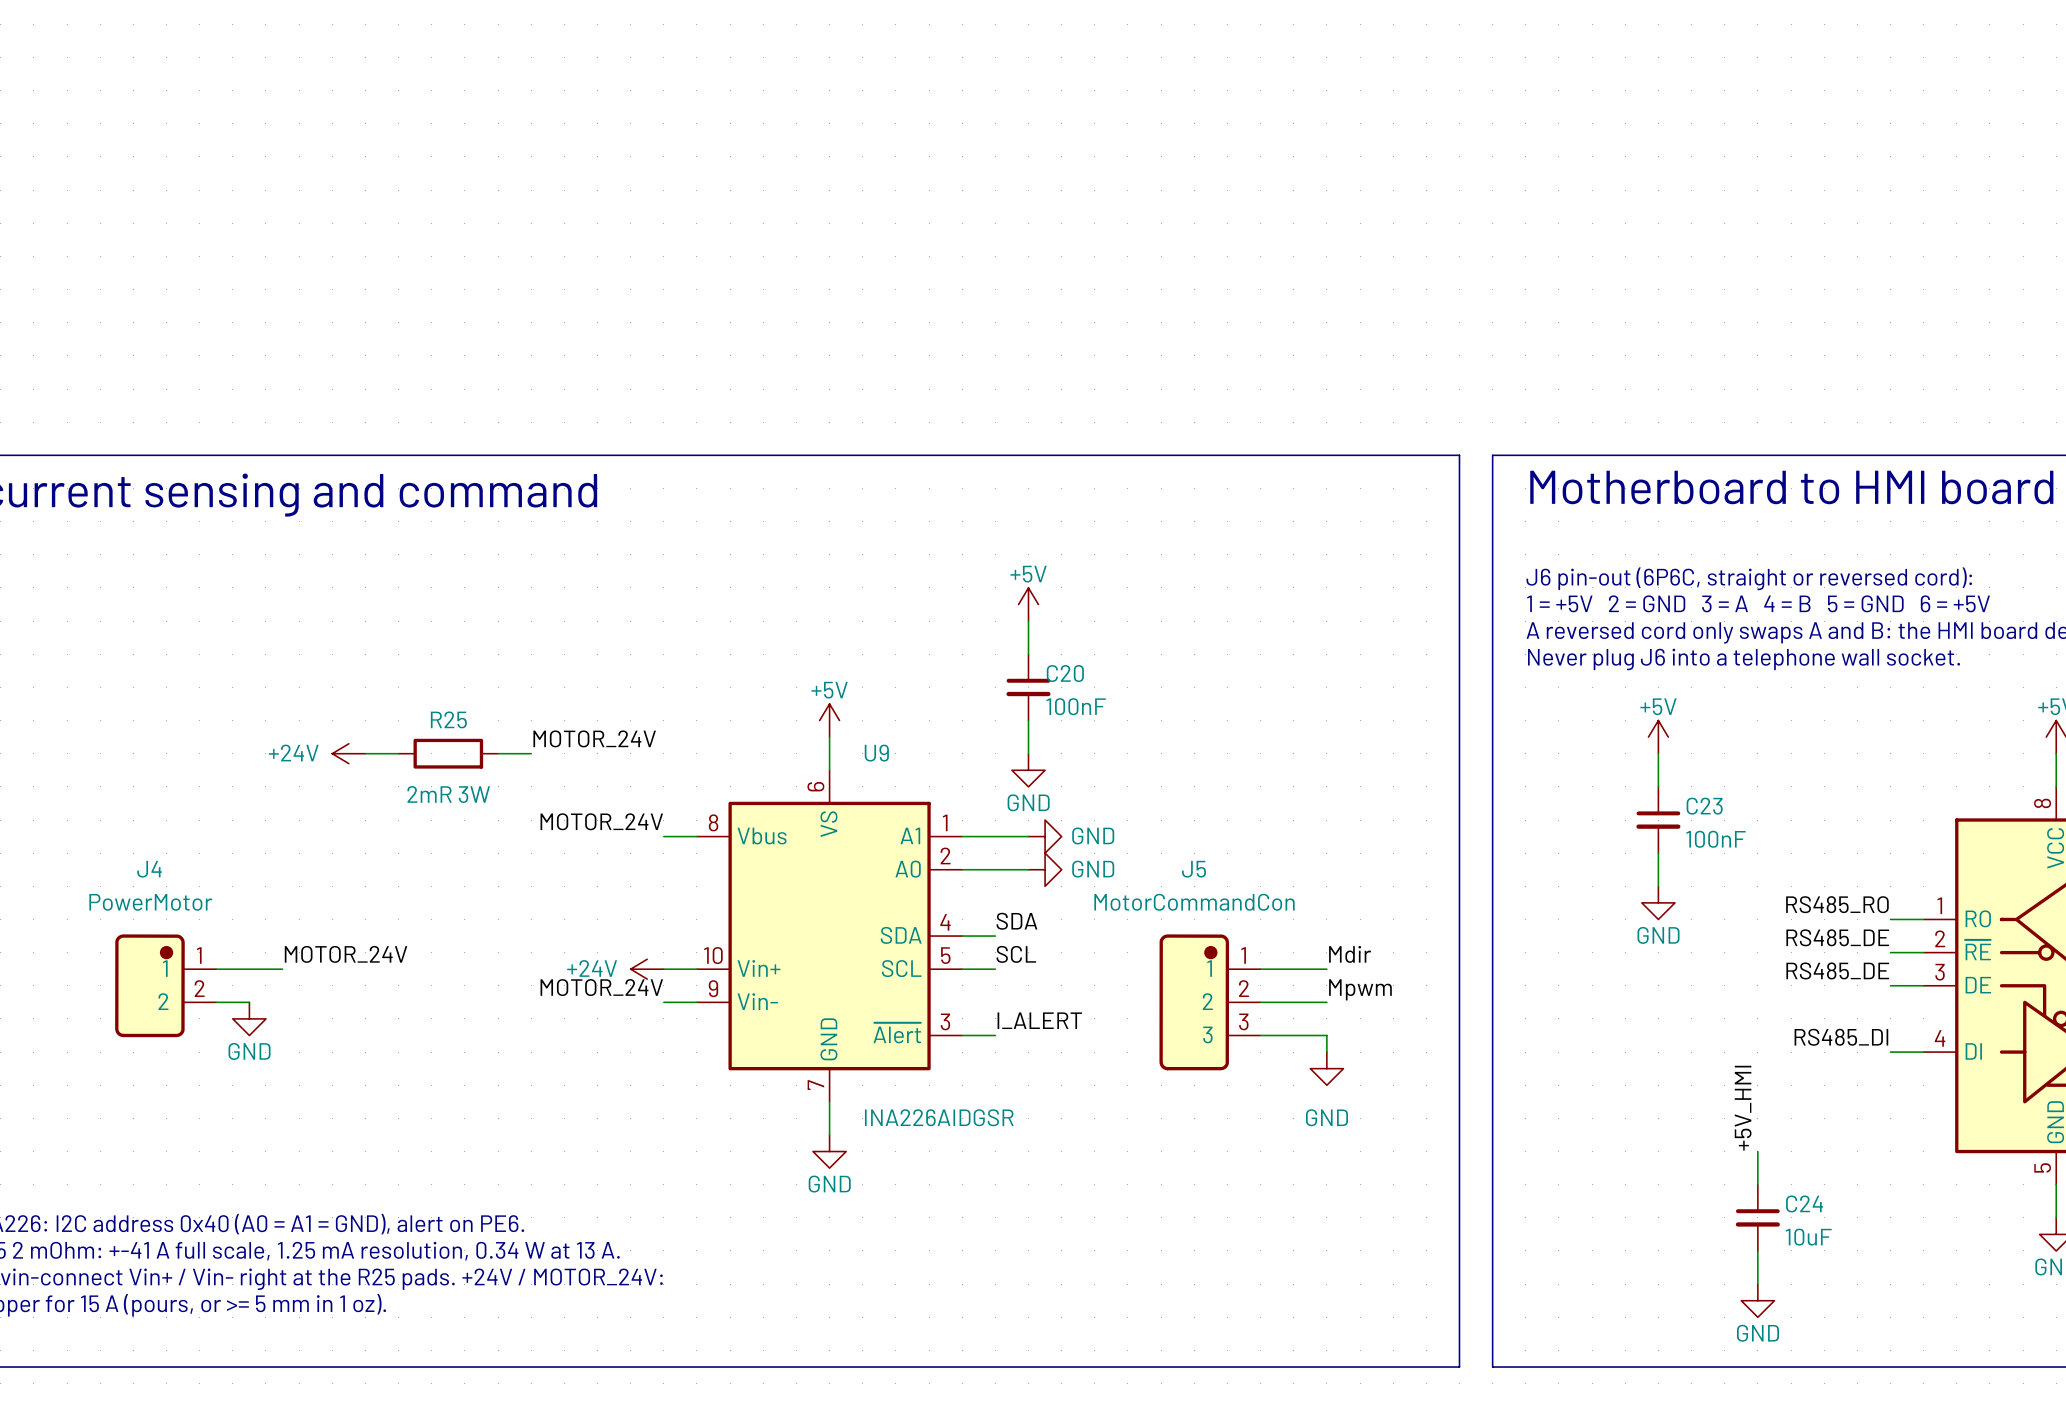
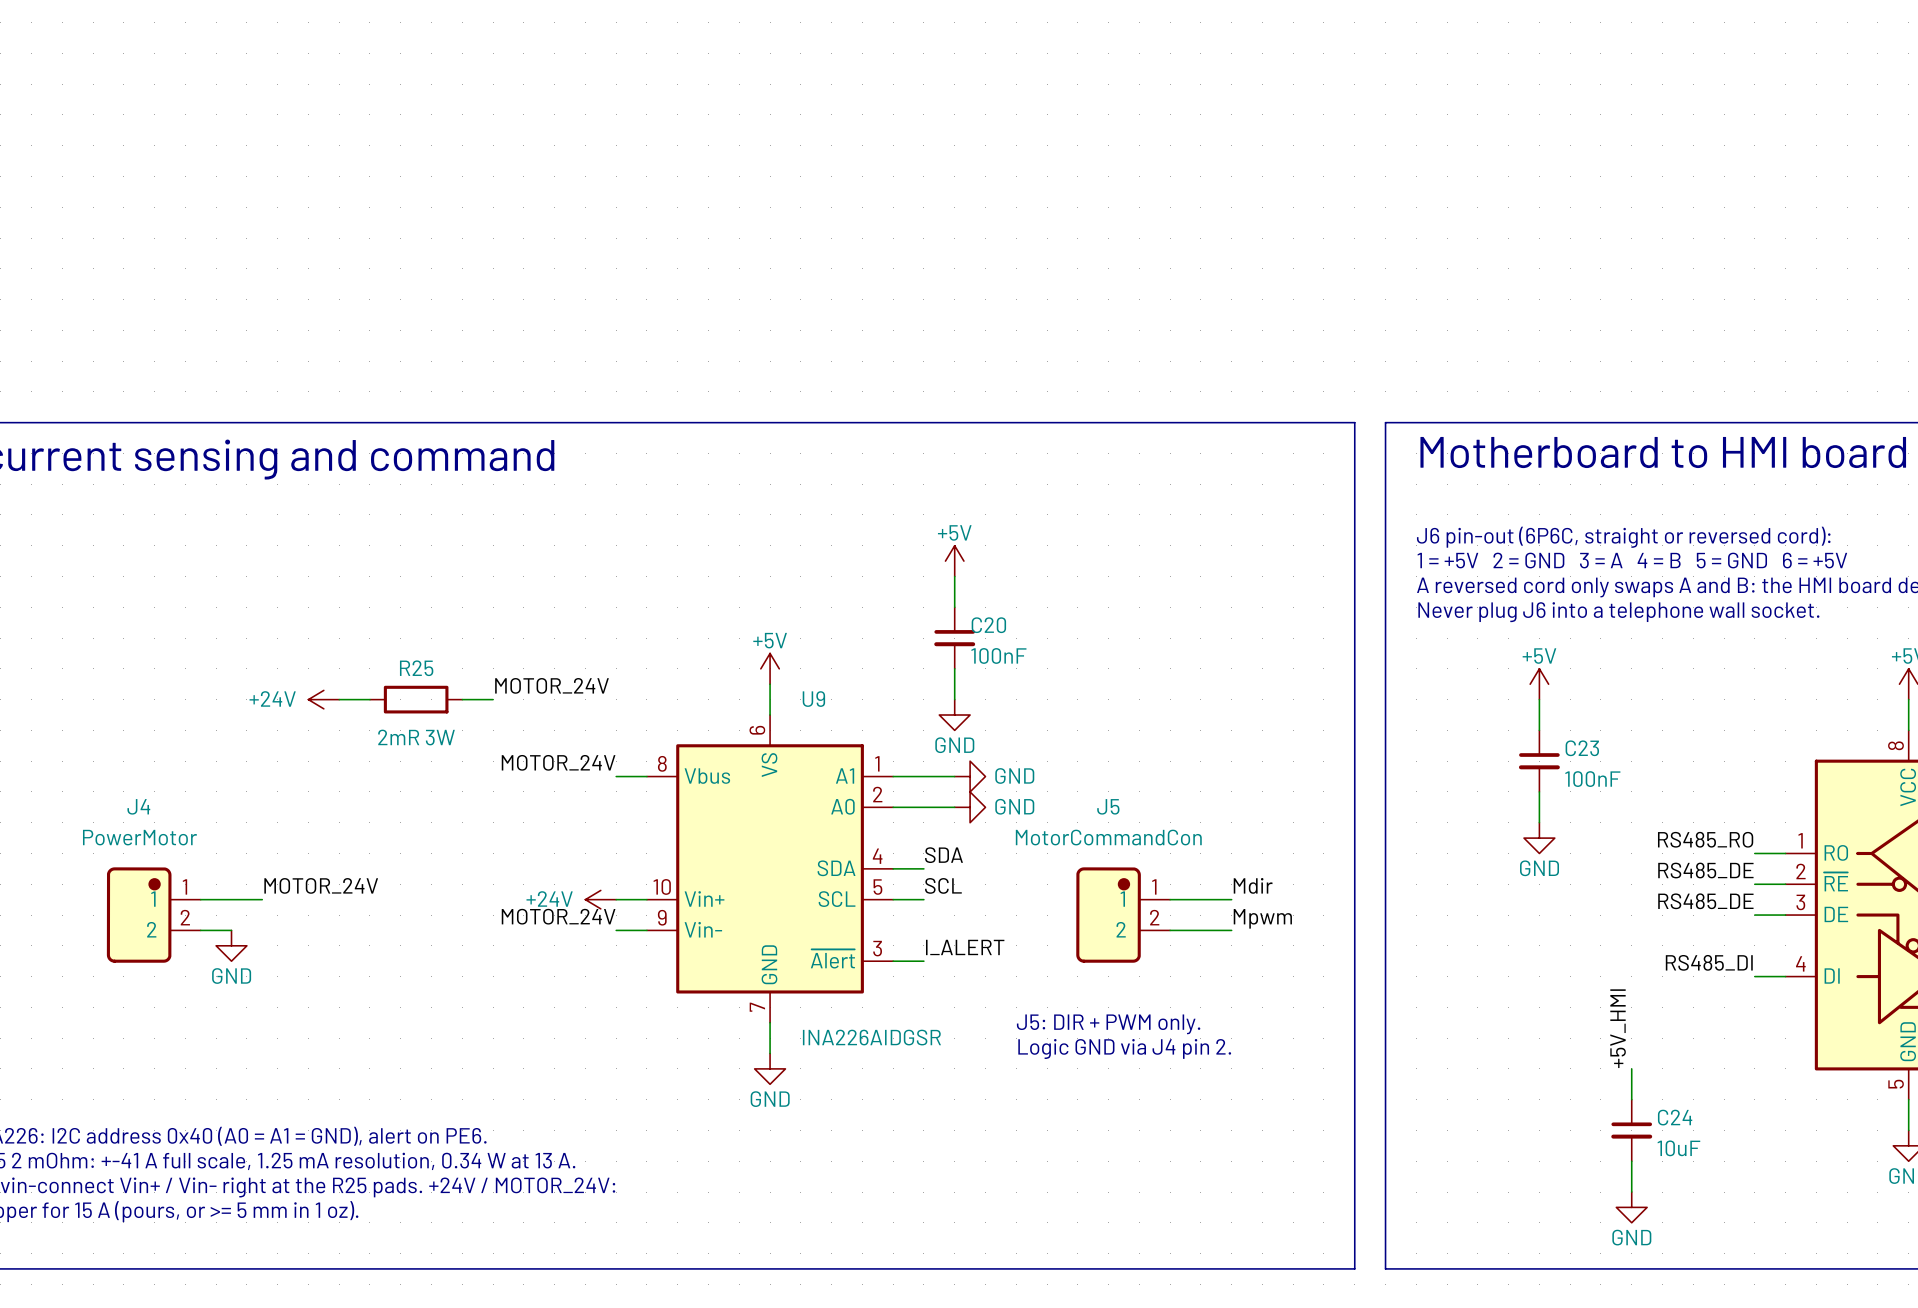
J5 symbol: [1159, 934, 1261, 1071] -> [1076, 867, 1171, 963]
wire: (1260, 1035) (1326, 1035) (1326, 1052) -> none
power symbol: GND (1326, 1068) -> none
text: none -> J5: DIR + PWM only. (1108, 1024)
text: none -> Logic GND via J4 pin 2. (1124, 1048)

